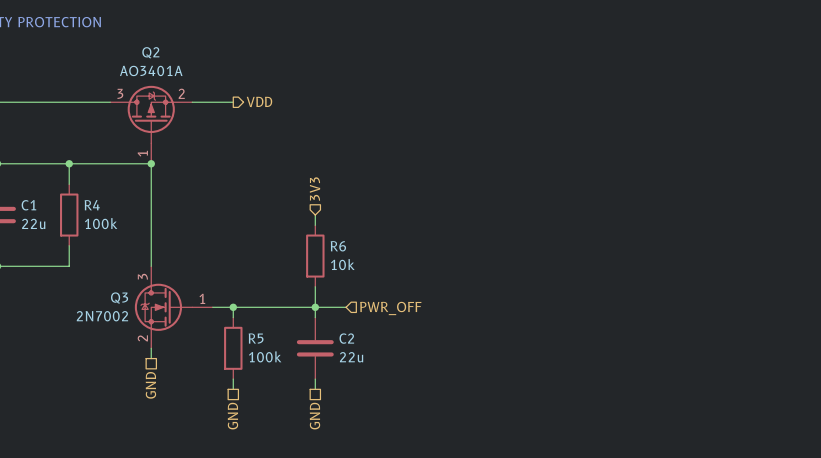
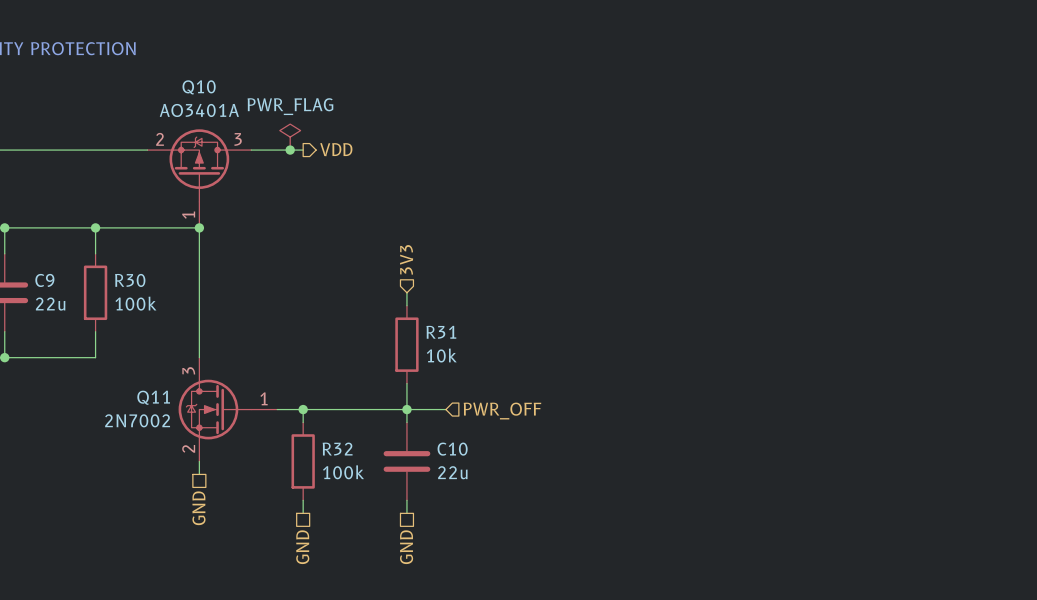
power symbol: none -> PWR_FLAG (290, 137)
junction: none -> (290, 150)
Q2: AO3401A (151, 124) -> none
Q10: none -> AO3401A (199, 178)
C1 name: C1 (28, 205) -> C9 (44, 280)
R4 name: R4 (92, 205) -> R30 (130, 280)
R6 name: R6 (338, 246) -> R31 (441, 332)
Q3 name: Q3 (119, 298) -> Q11 (153, 397)
R5 name: R5 (256, 338) -> R32 (337, 449)
C2 name: C2 (346, 338) -> C10 (452, 449)

